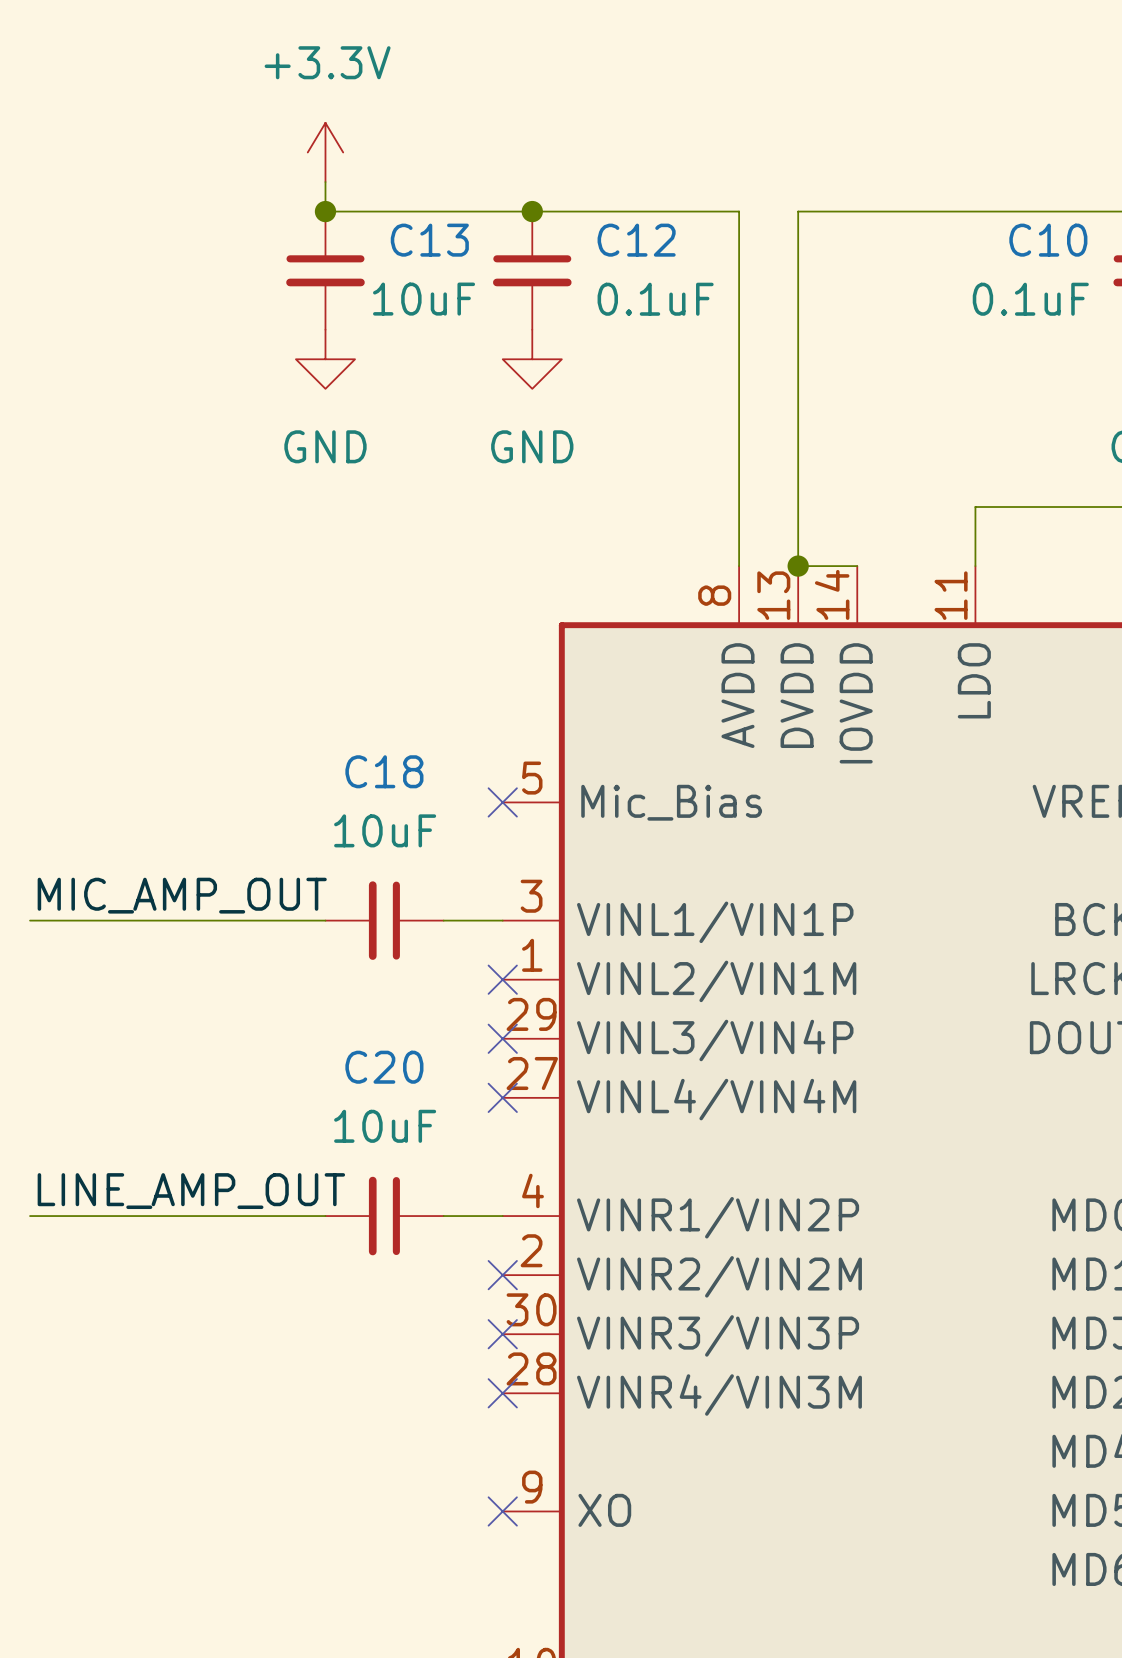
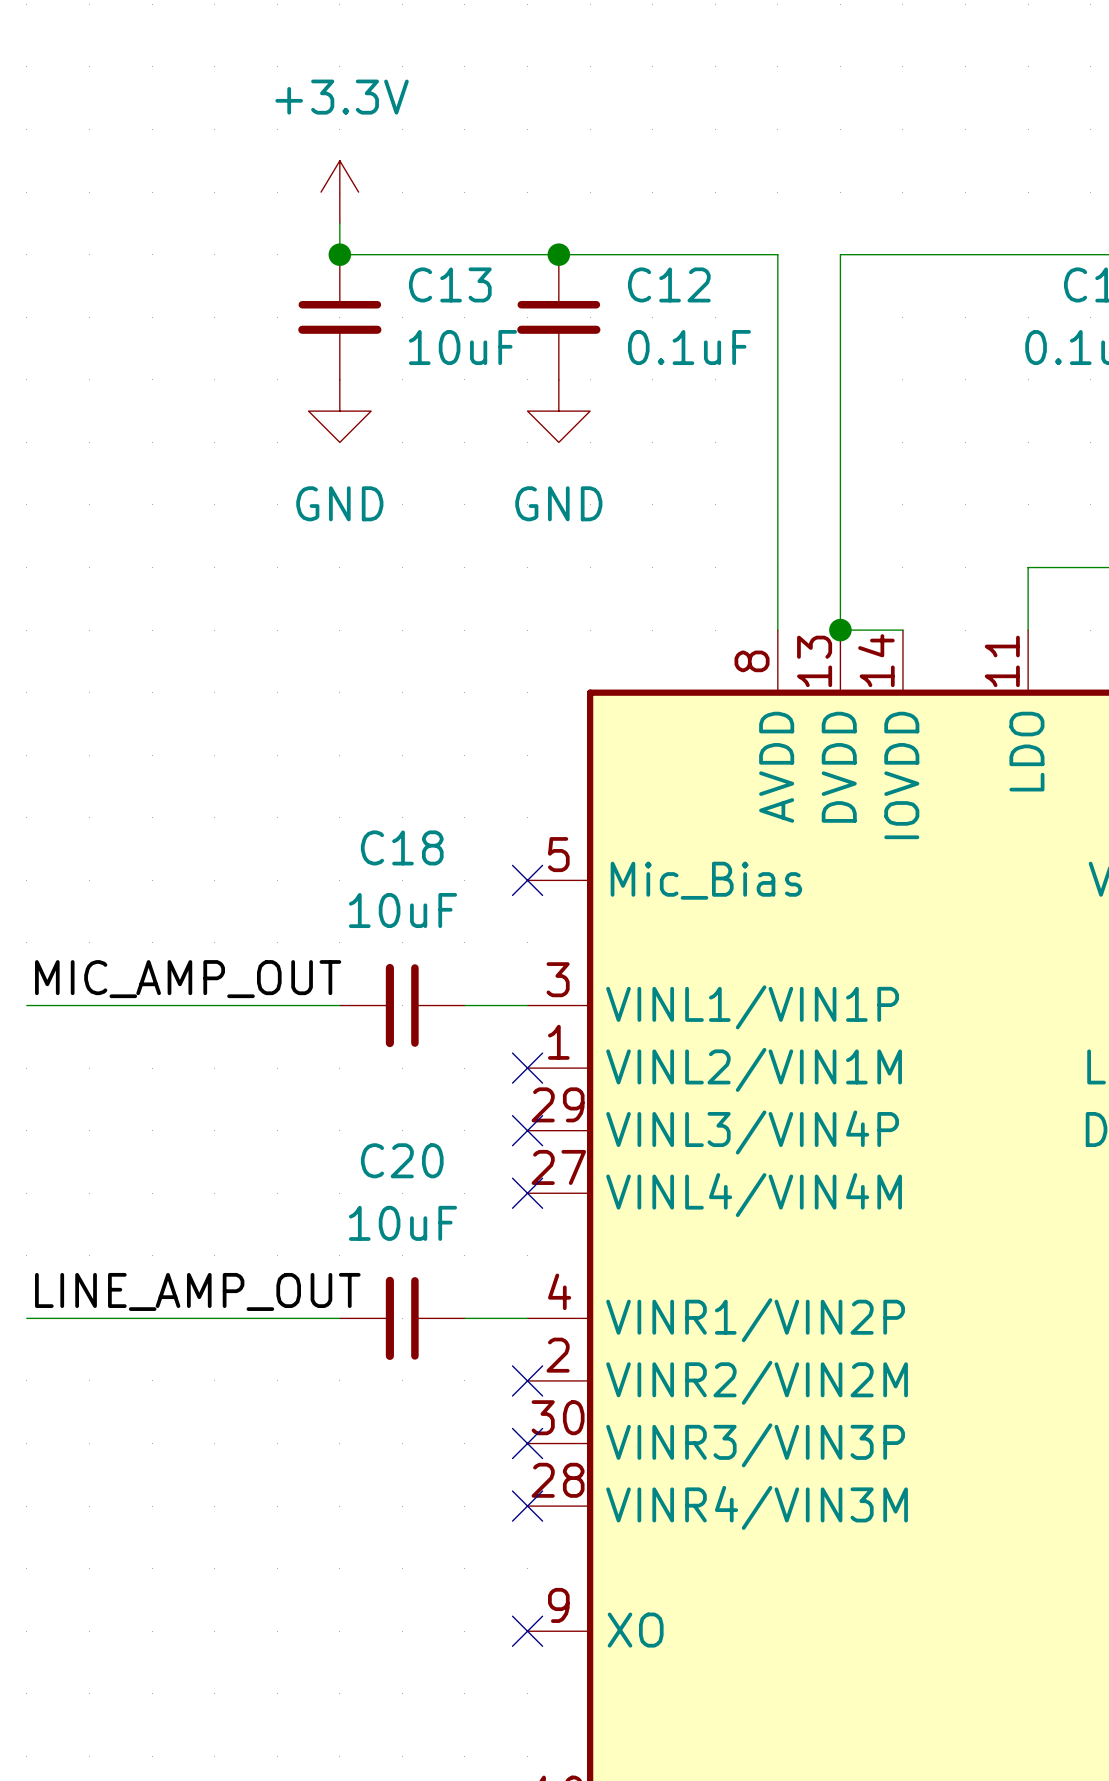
C13 value position: 10uF (424, 299) -> 10uF (462, 347)

